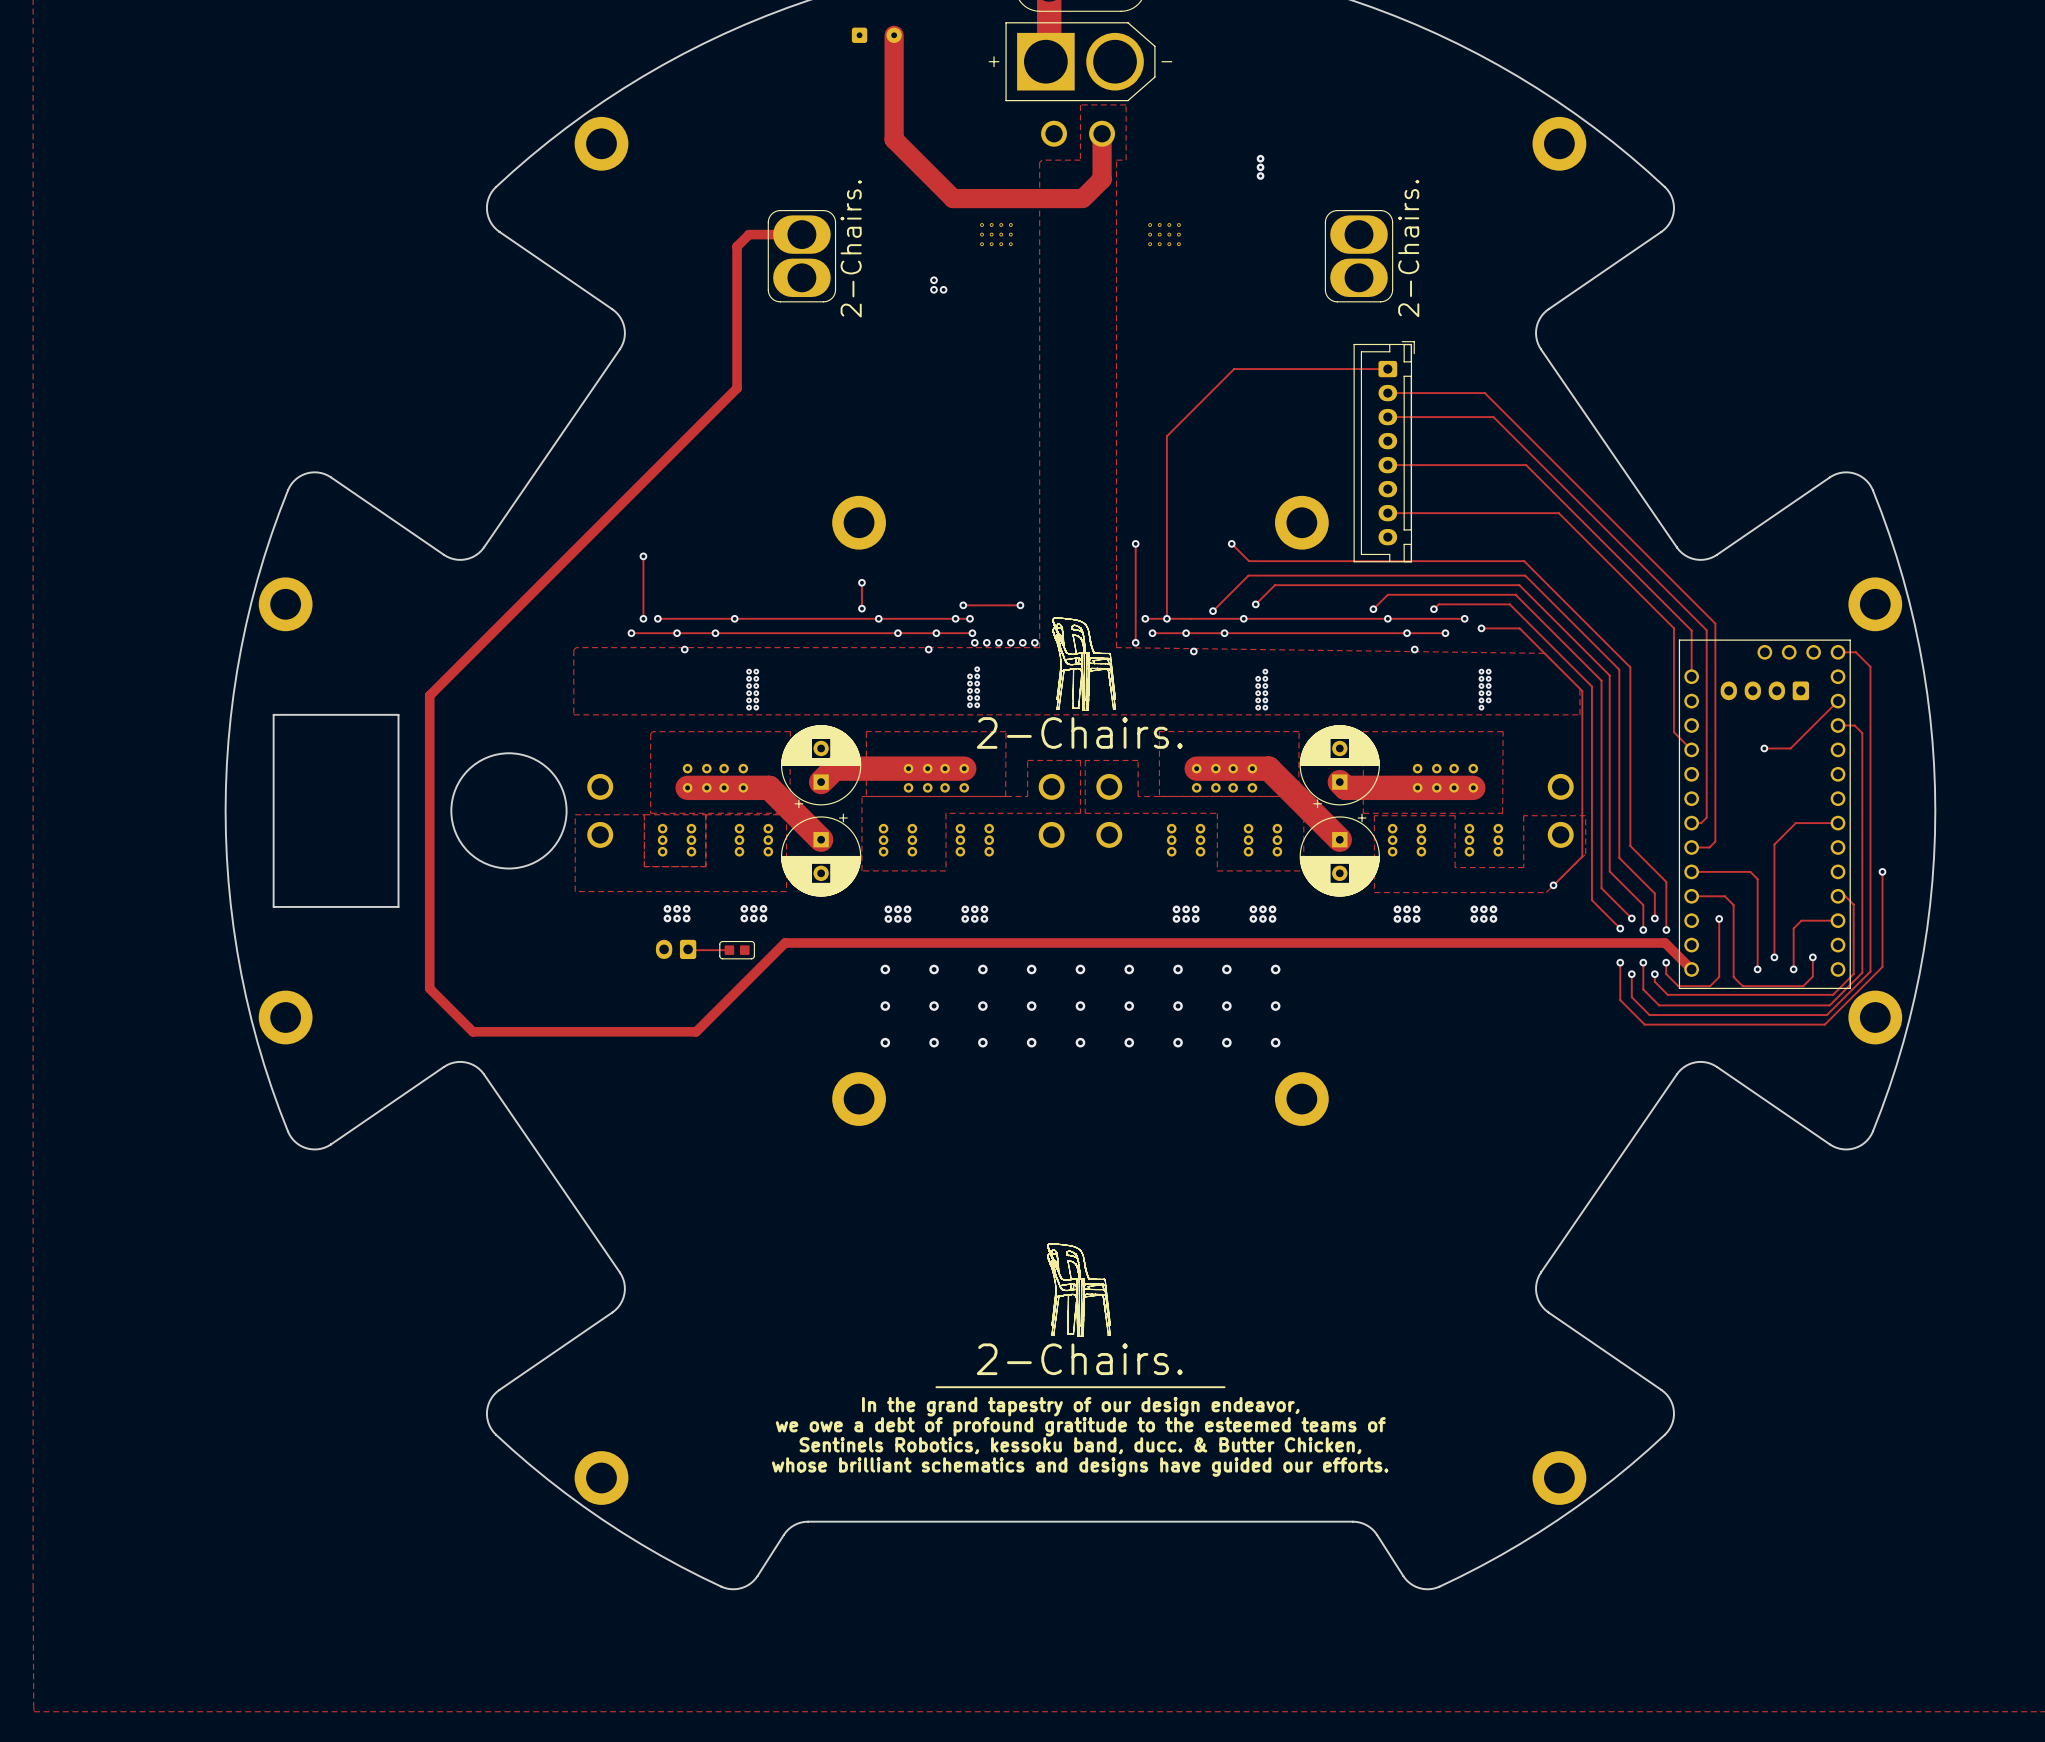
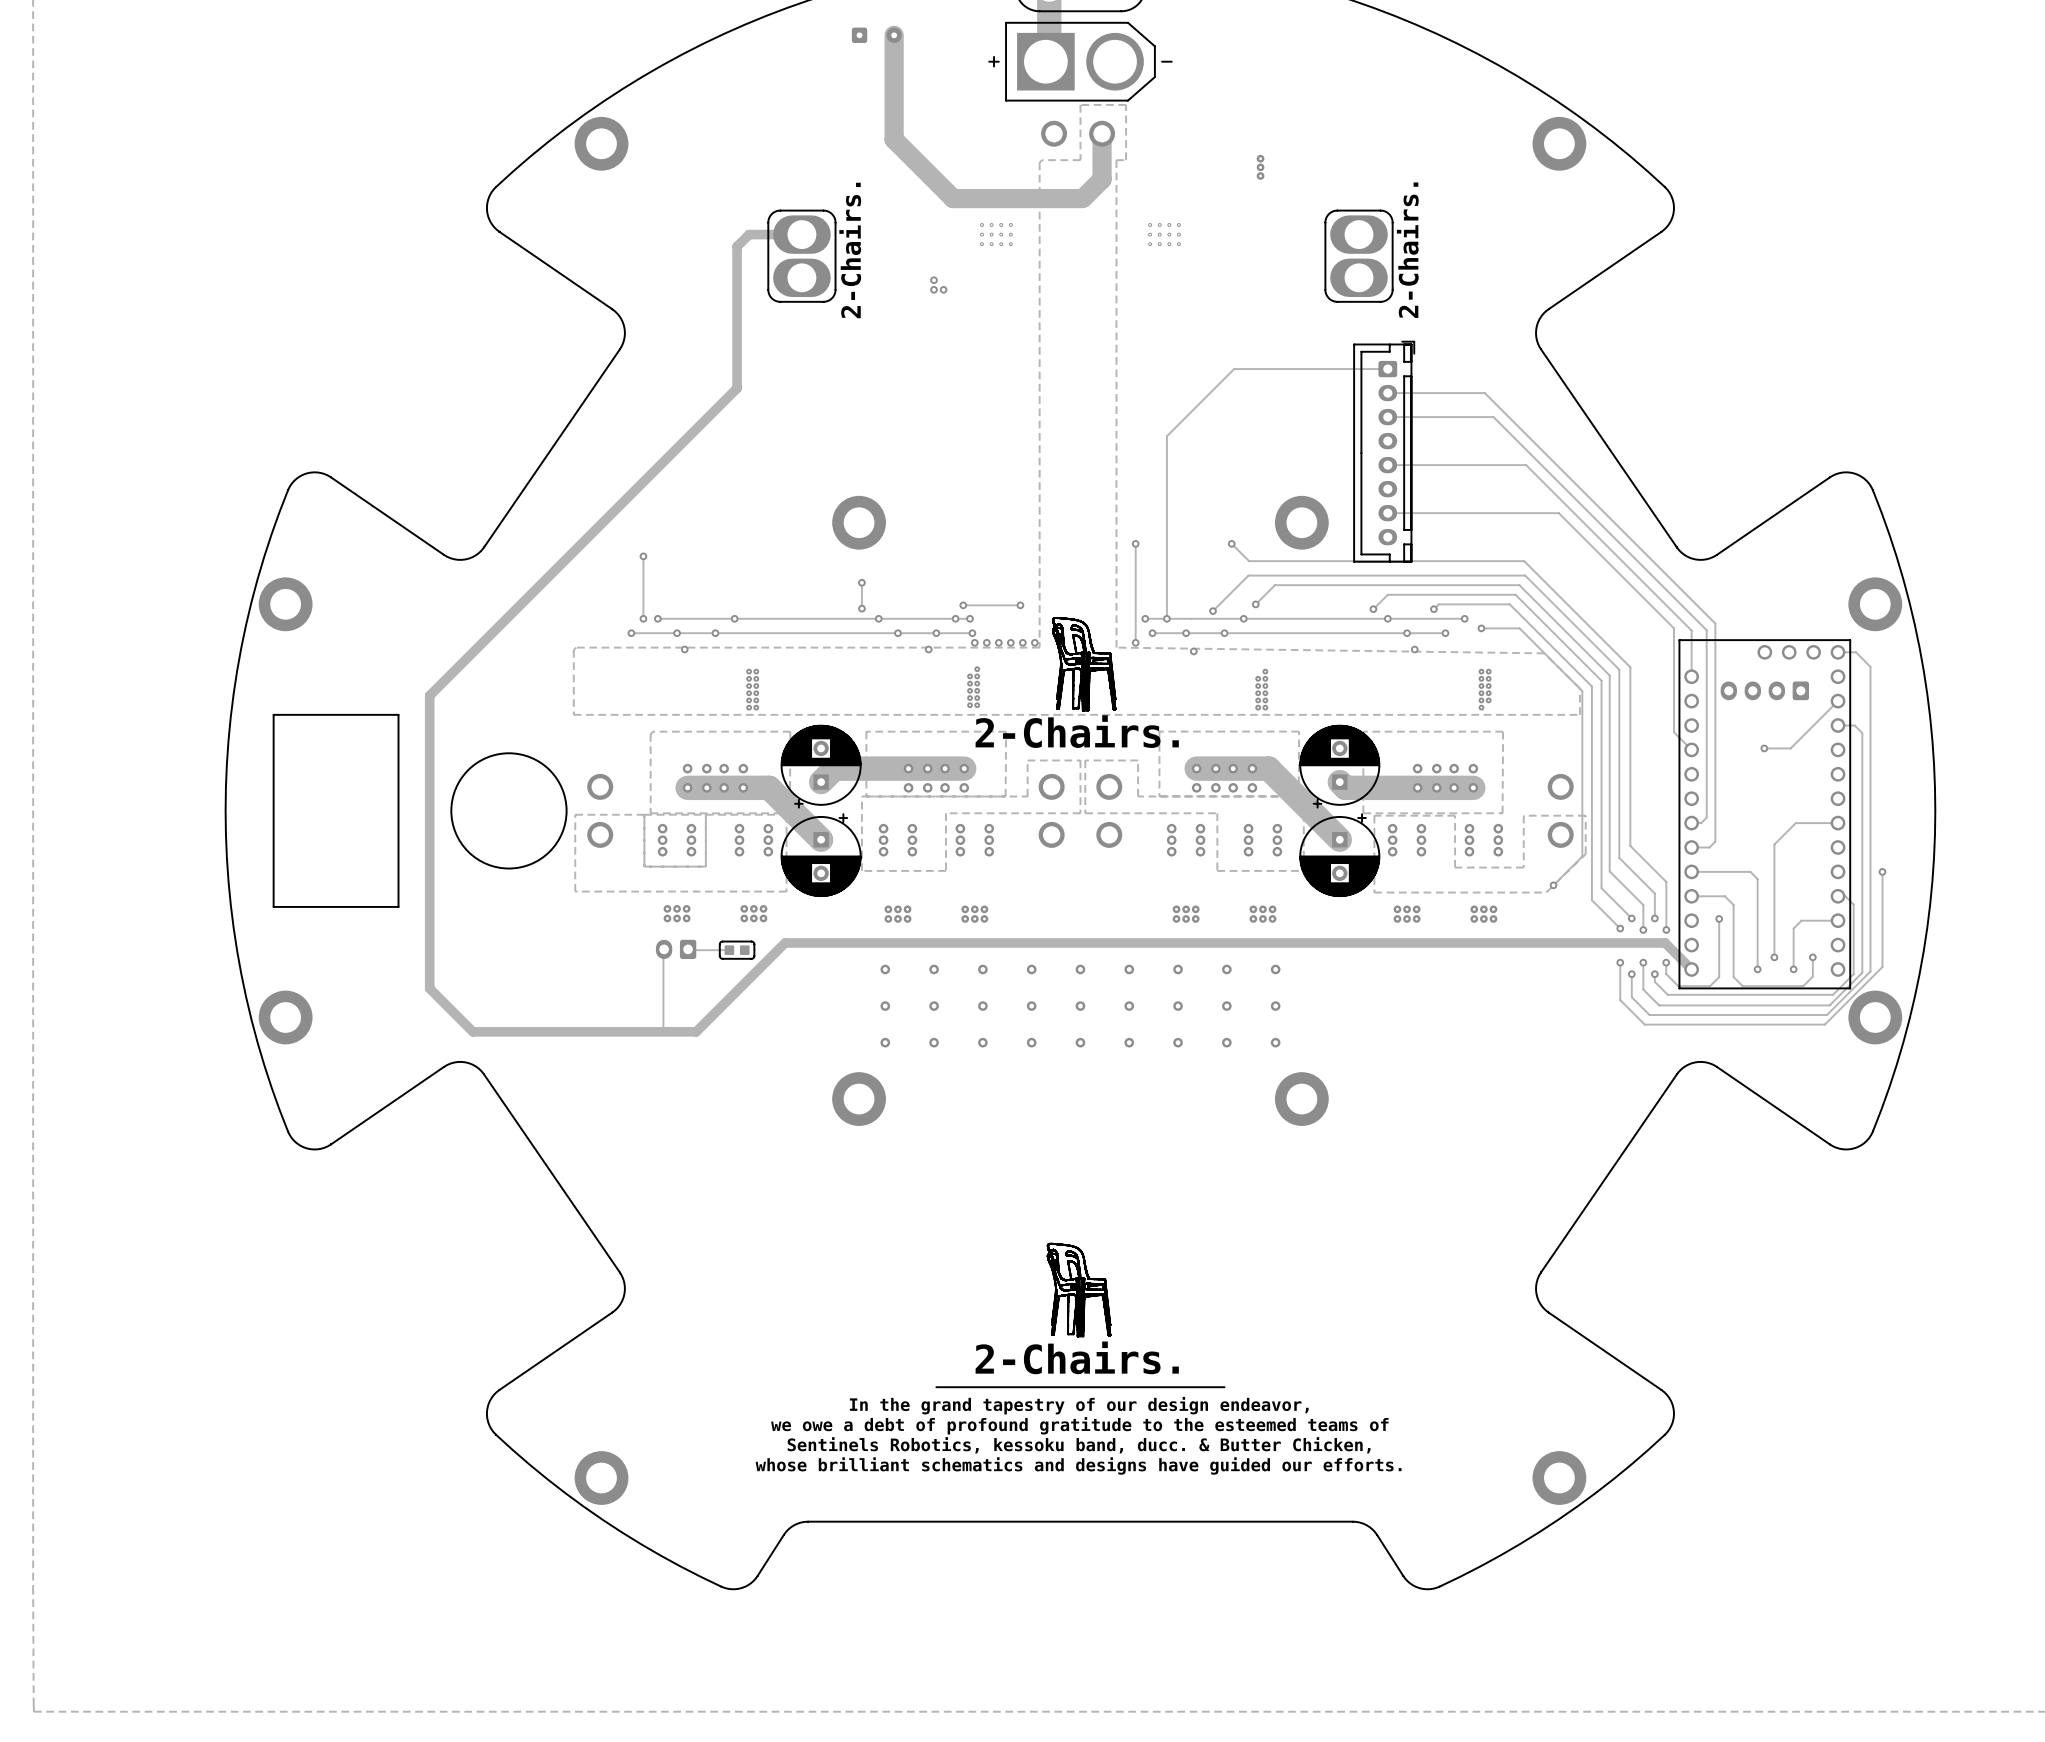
track: none -> (663, 950) (663, 1031)

